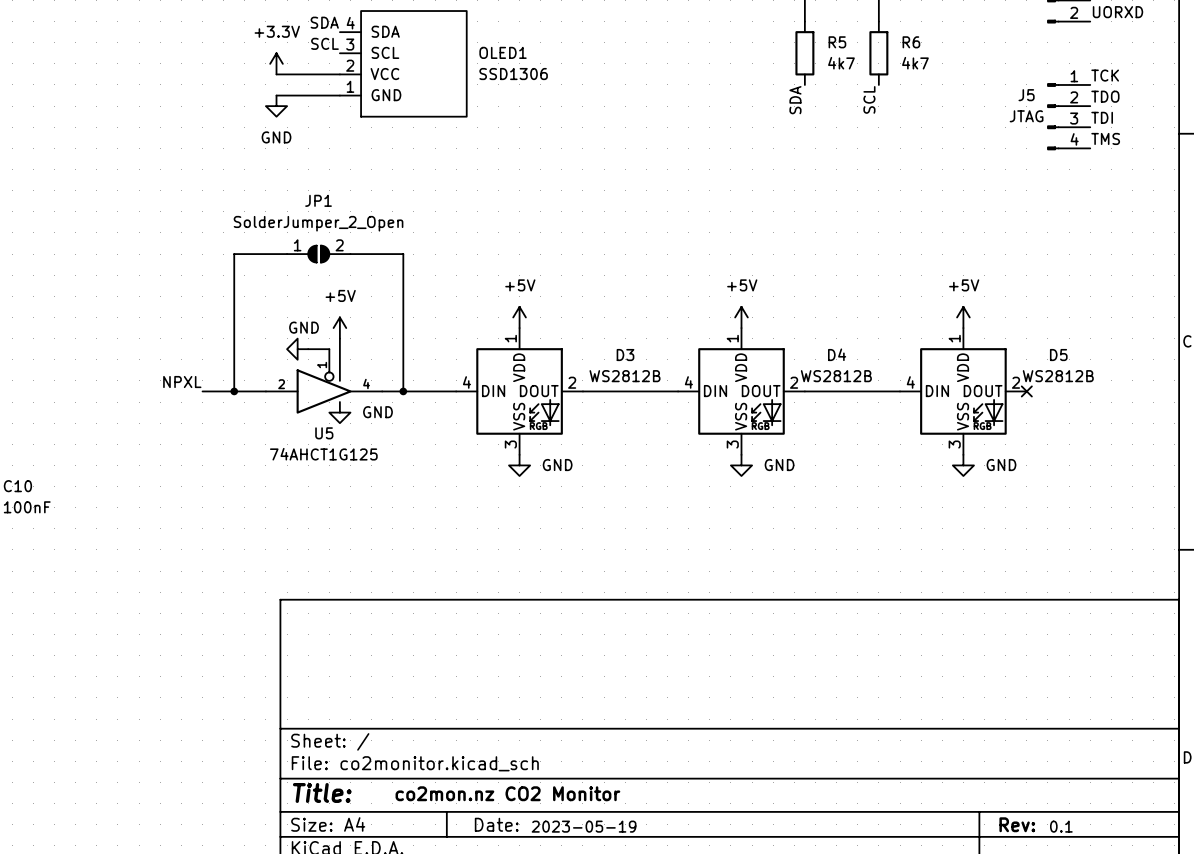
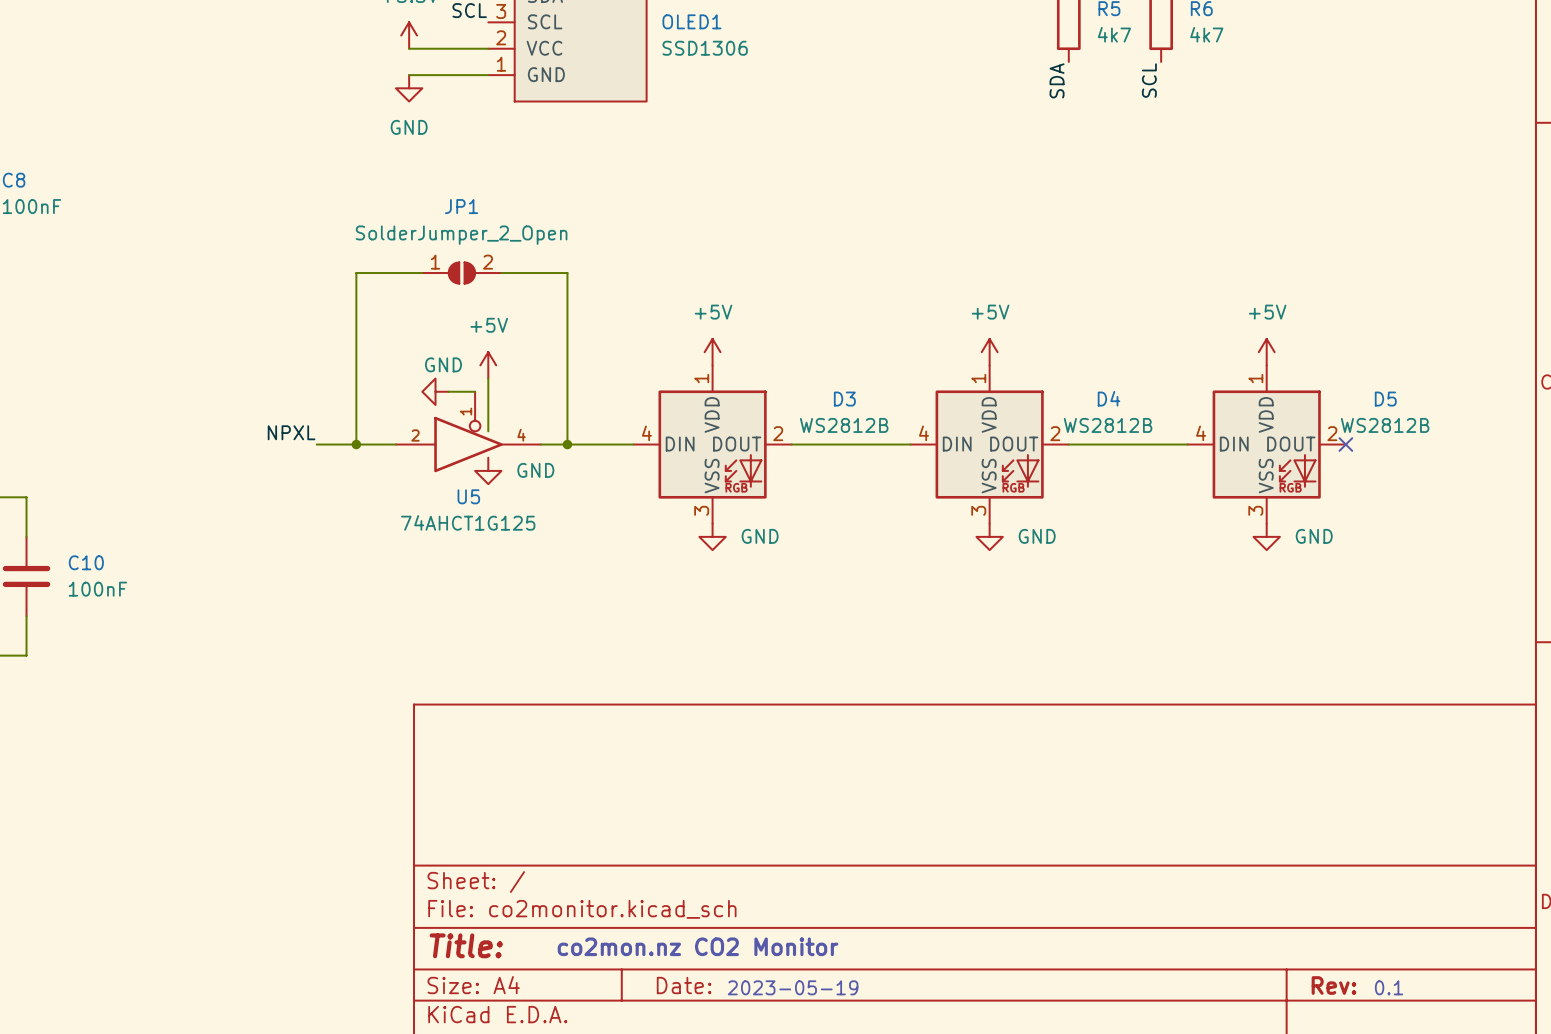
label: TCK (1105, 75) -> none
label: TDO (1105, 96) -> none
J5: JTAG (1068, 116) -> none
label: TDI (1102, 117) -> none
label: TMS (1105, 138) -> none

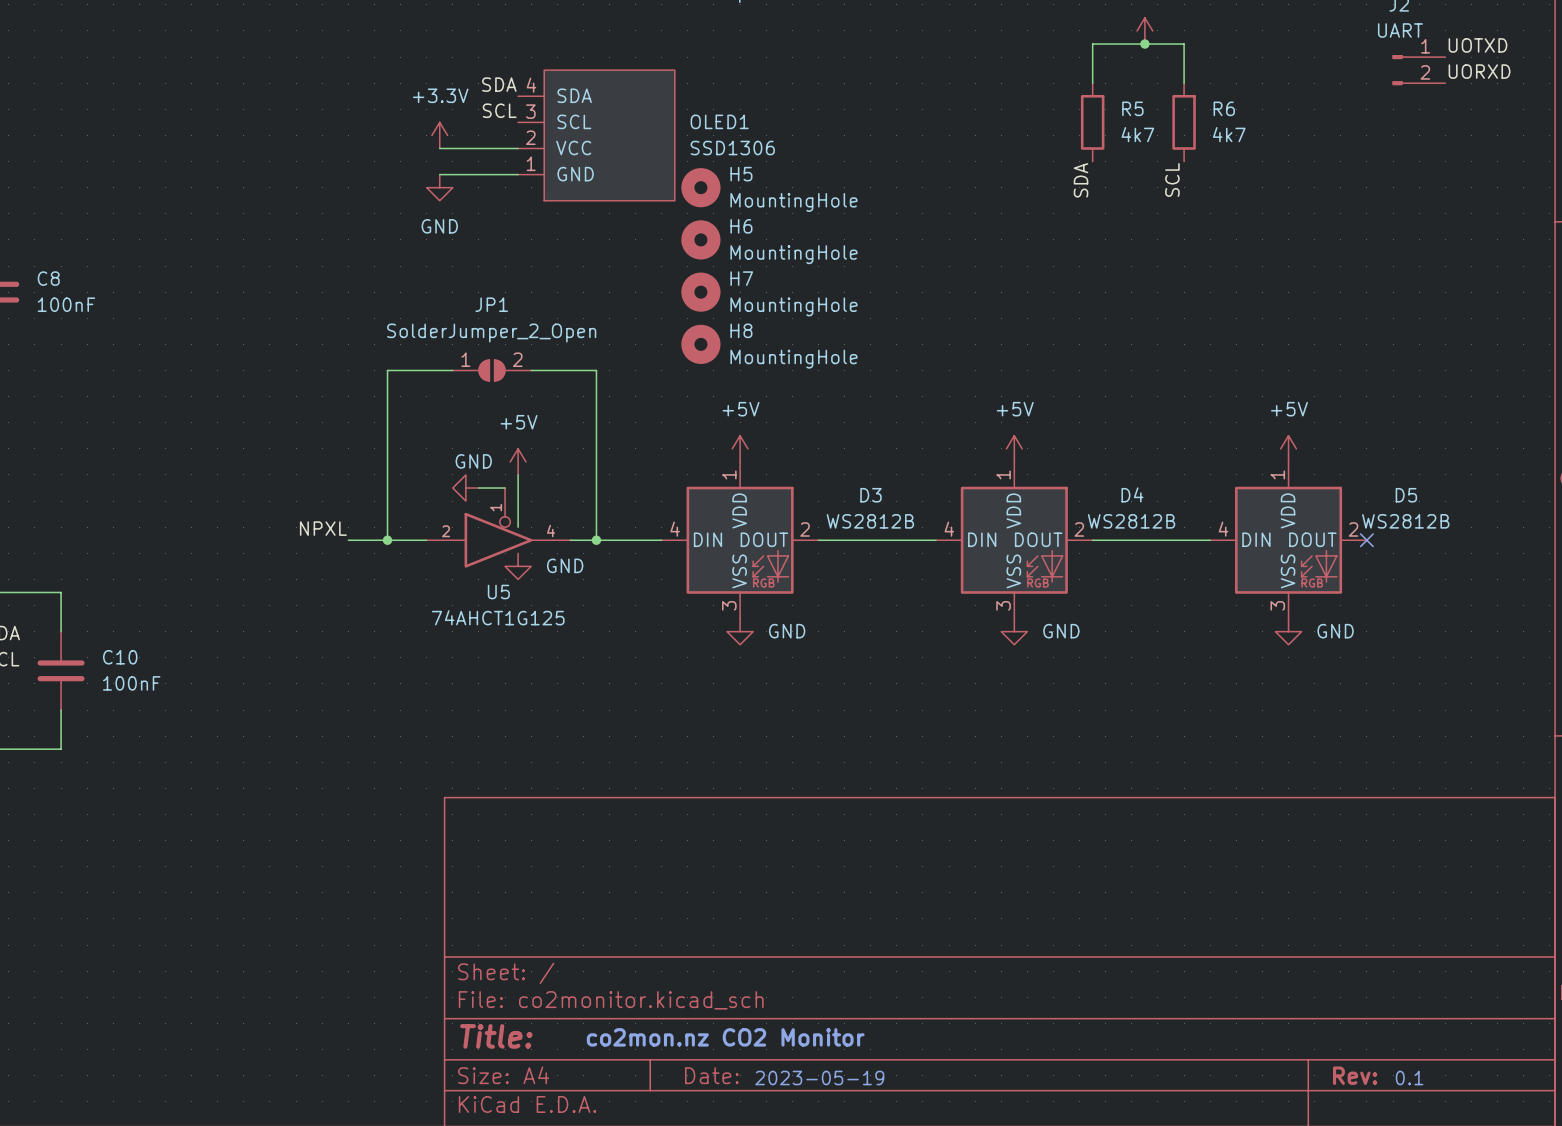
H5: none -> MountingHole (700, 187)
H6: none -> MountingHole (700, 239)
H7: none -> MountingHole (700, 292)
H8: none -> MountingHole (700, 344)

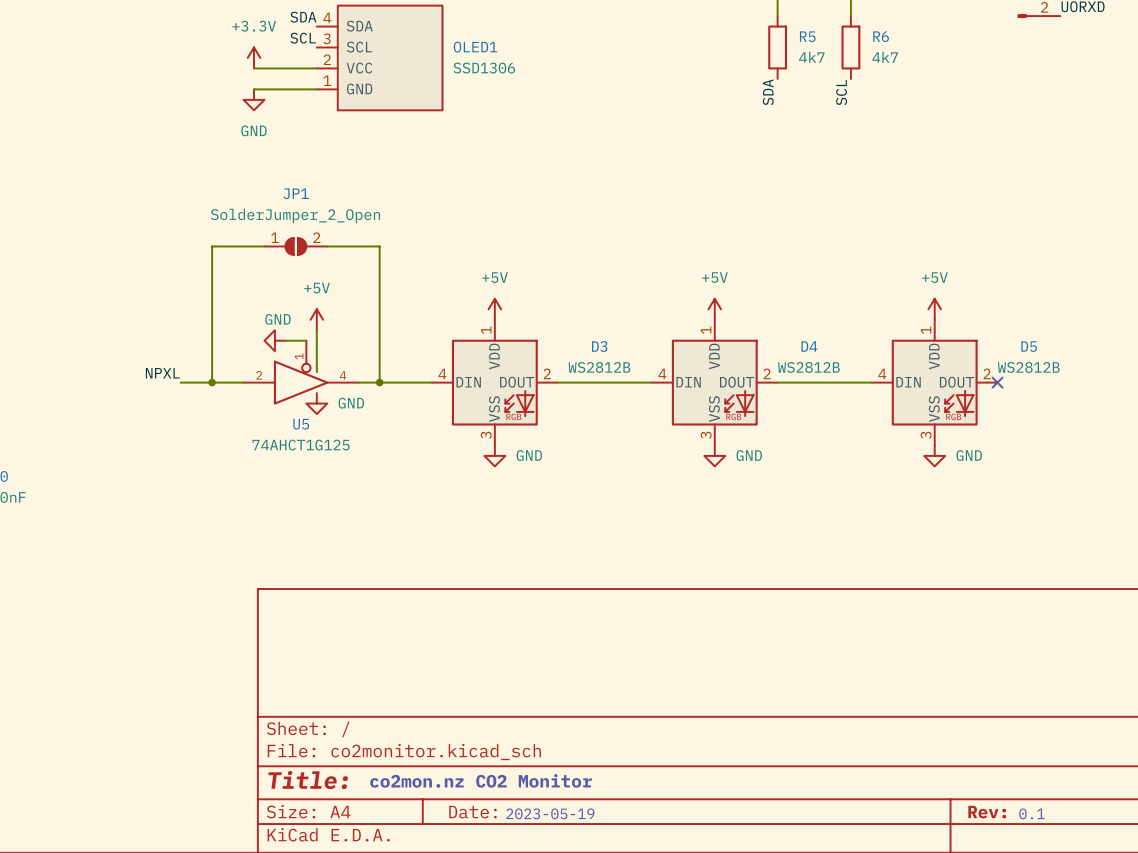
H5: MountingHole (700, 187) -> none
H6: MountingHole (700, 239) -> none
H7: MountingHole (700, 292) -> none
H8: MountingHole (700, 344) -> none

